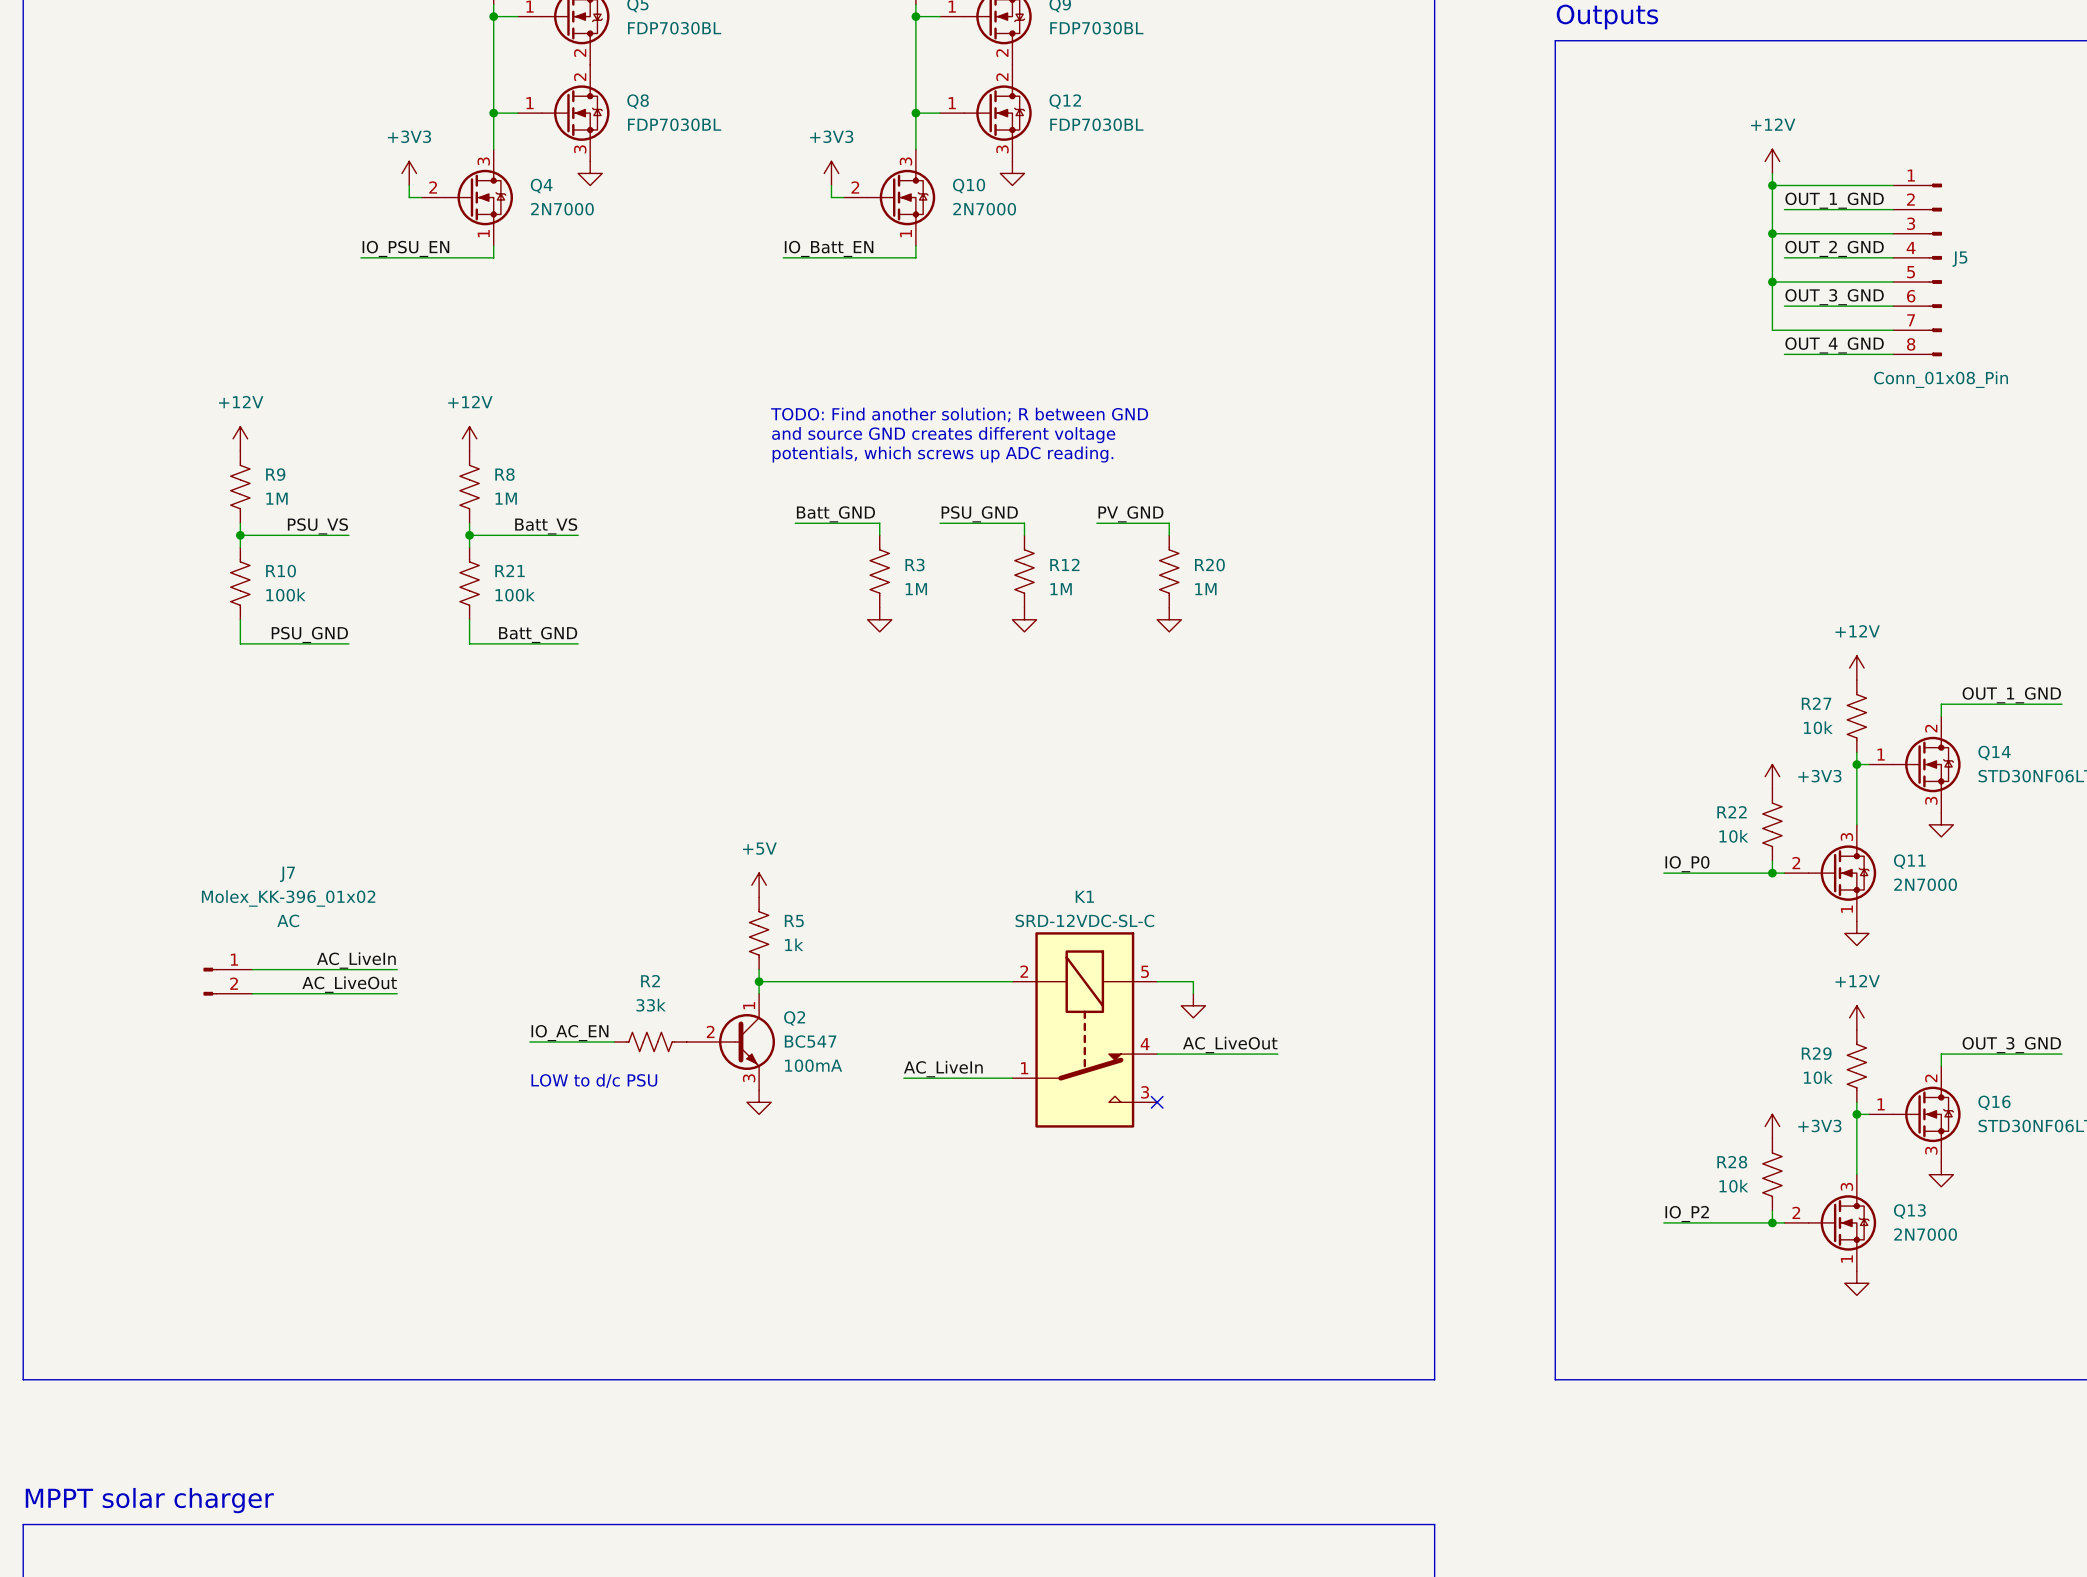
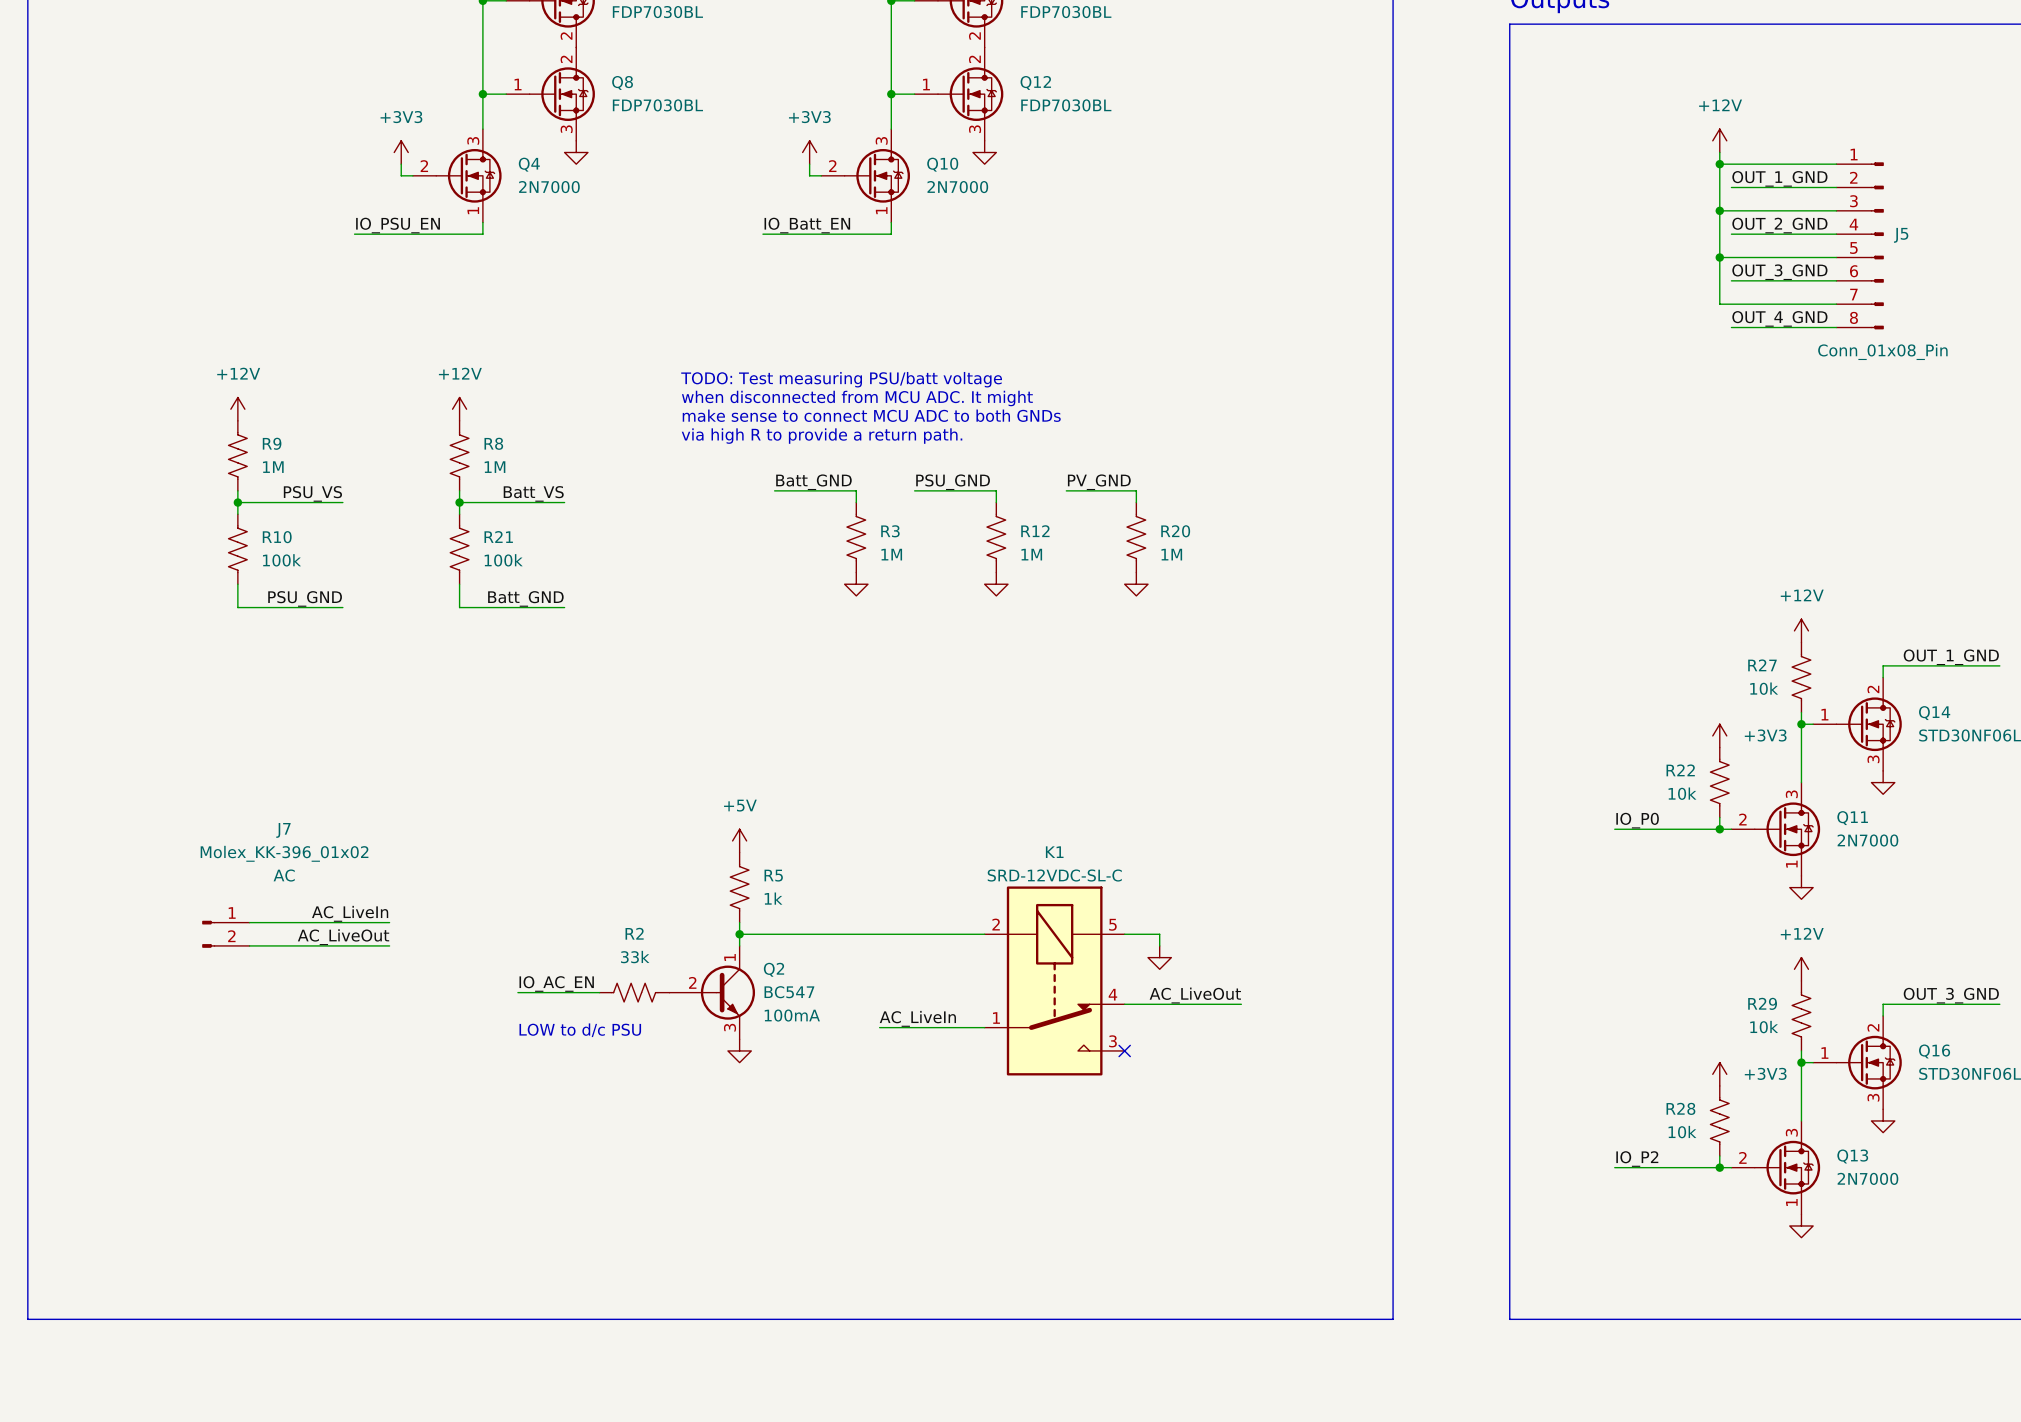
text: none -> TODO: Test measuring PSU/batt voltage (841, 379)
text: TODO: Find another solution; R between GND (959, 414) -> none
text: none -> when disconnected from MCU ADC. It might (857, 398)
text: and source GND creates different voltage (943, 435) -> none
text: none -> make sense to connect MCU ADC to both GNDs (871, 415)
text: potentials, which screws up ADC reading. (942, 454) -> none
text: none -> via high R to provide a return path. (822, 436)

